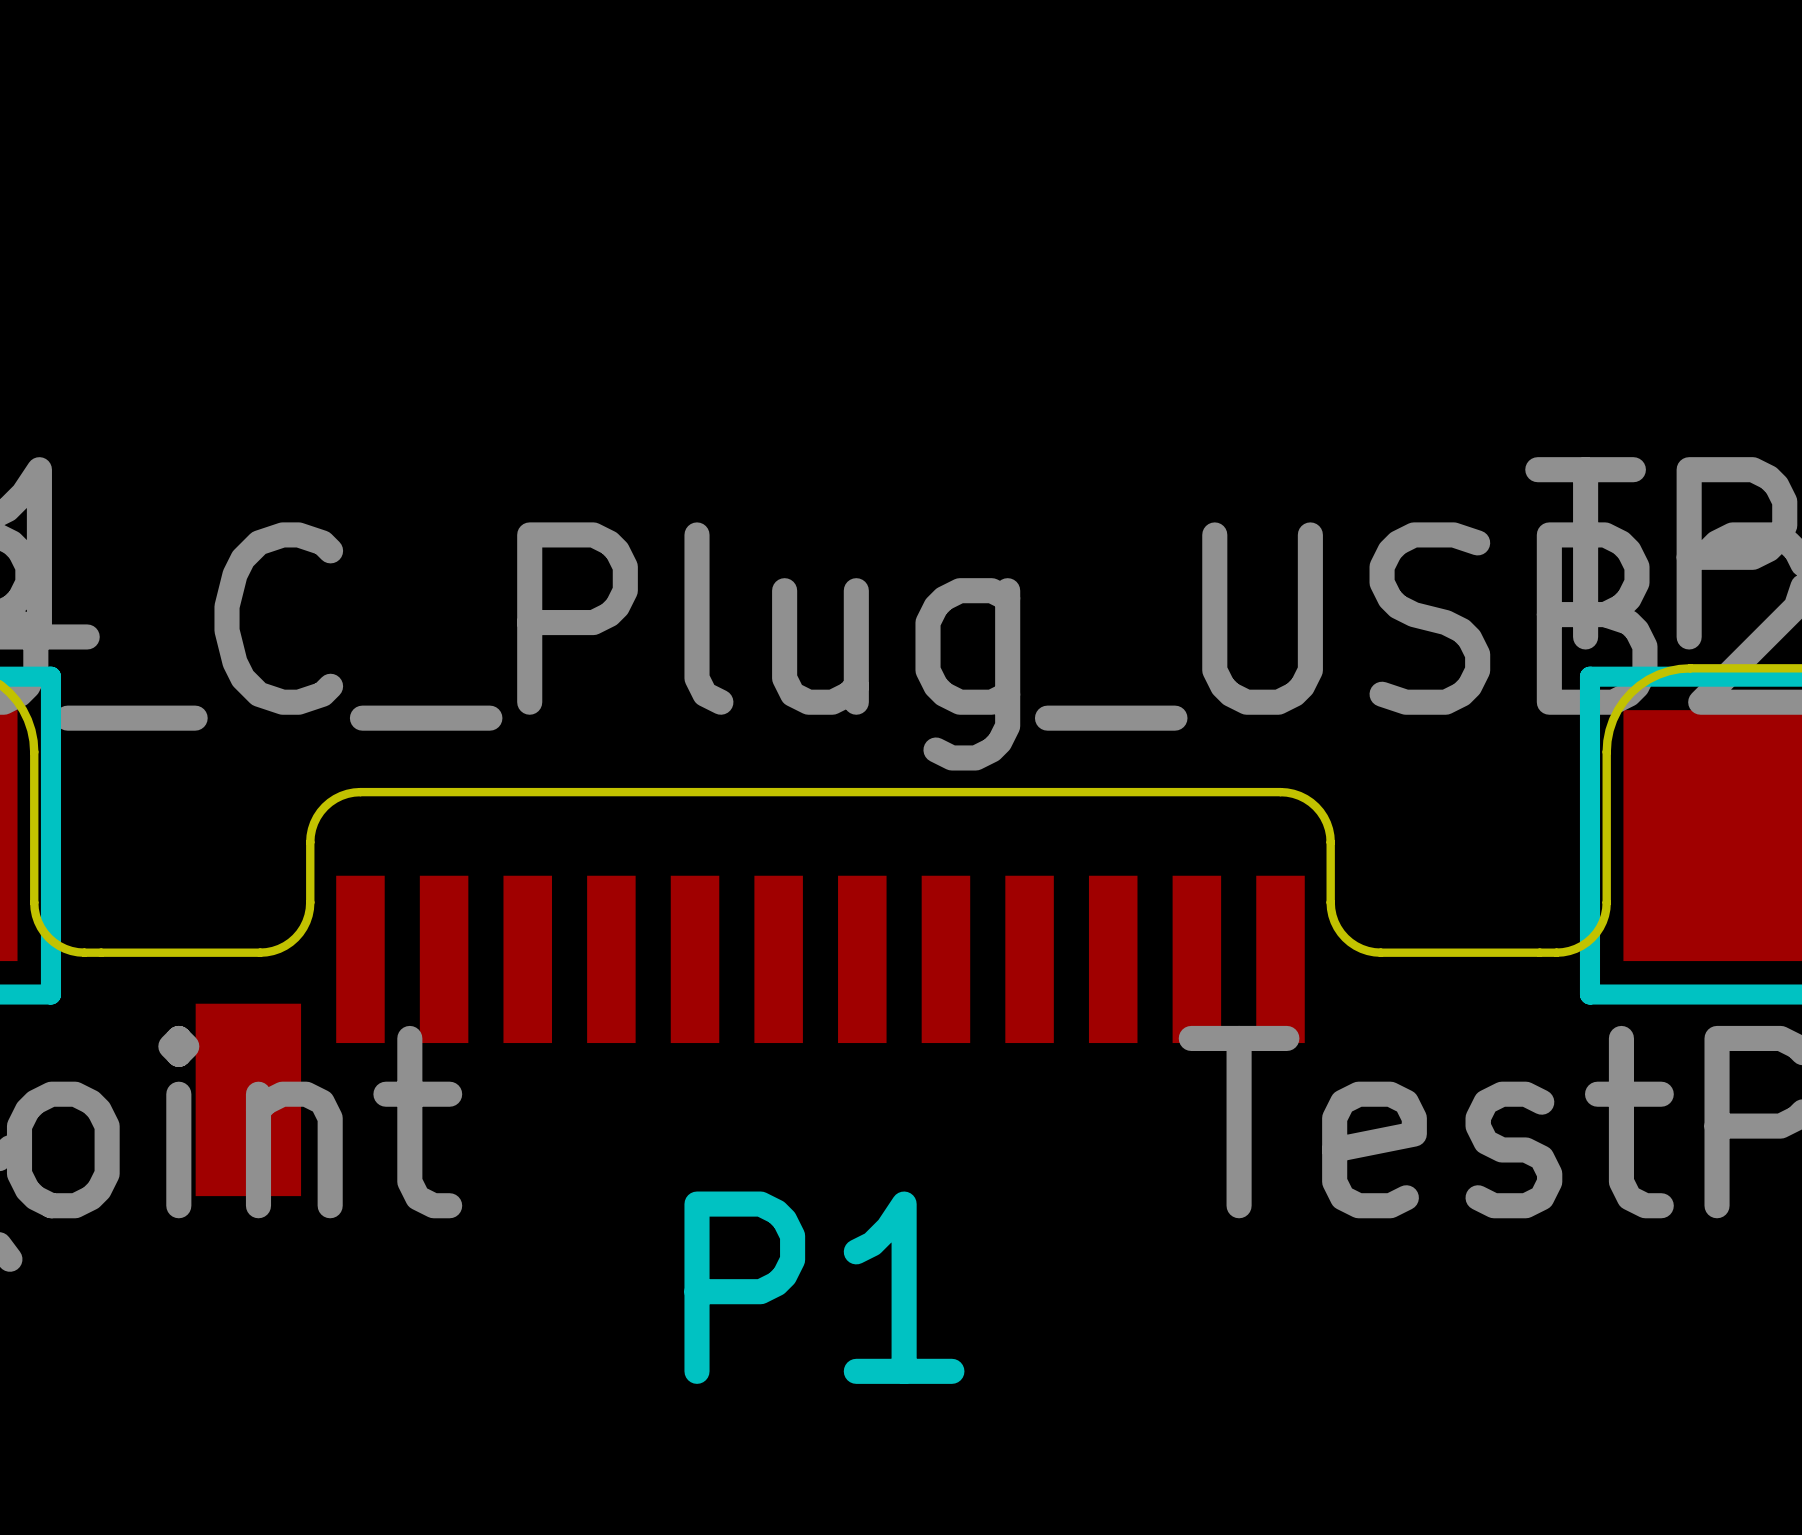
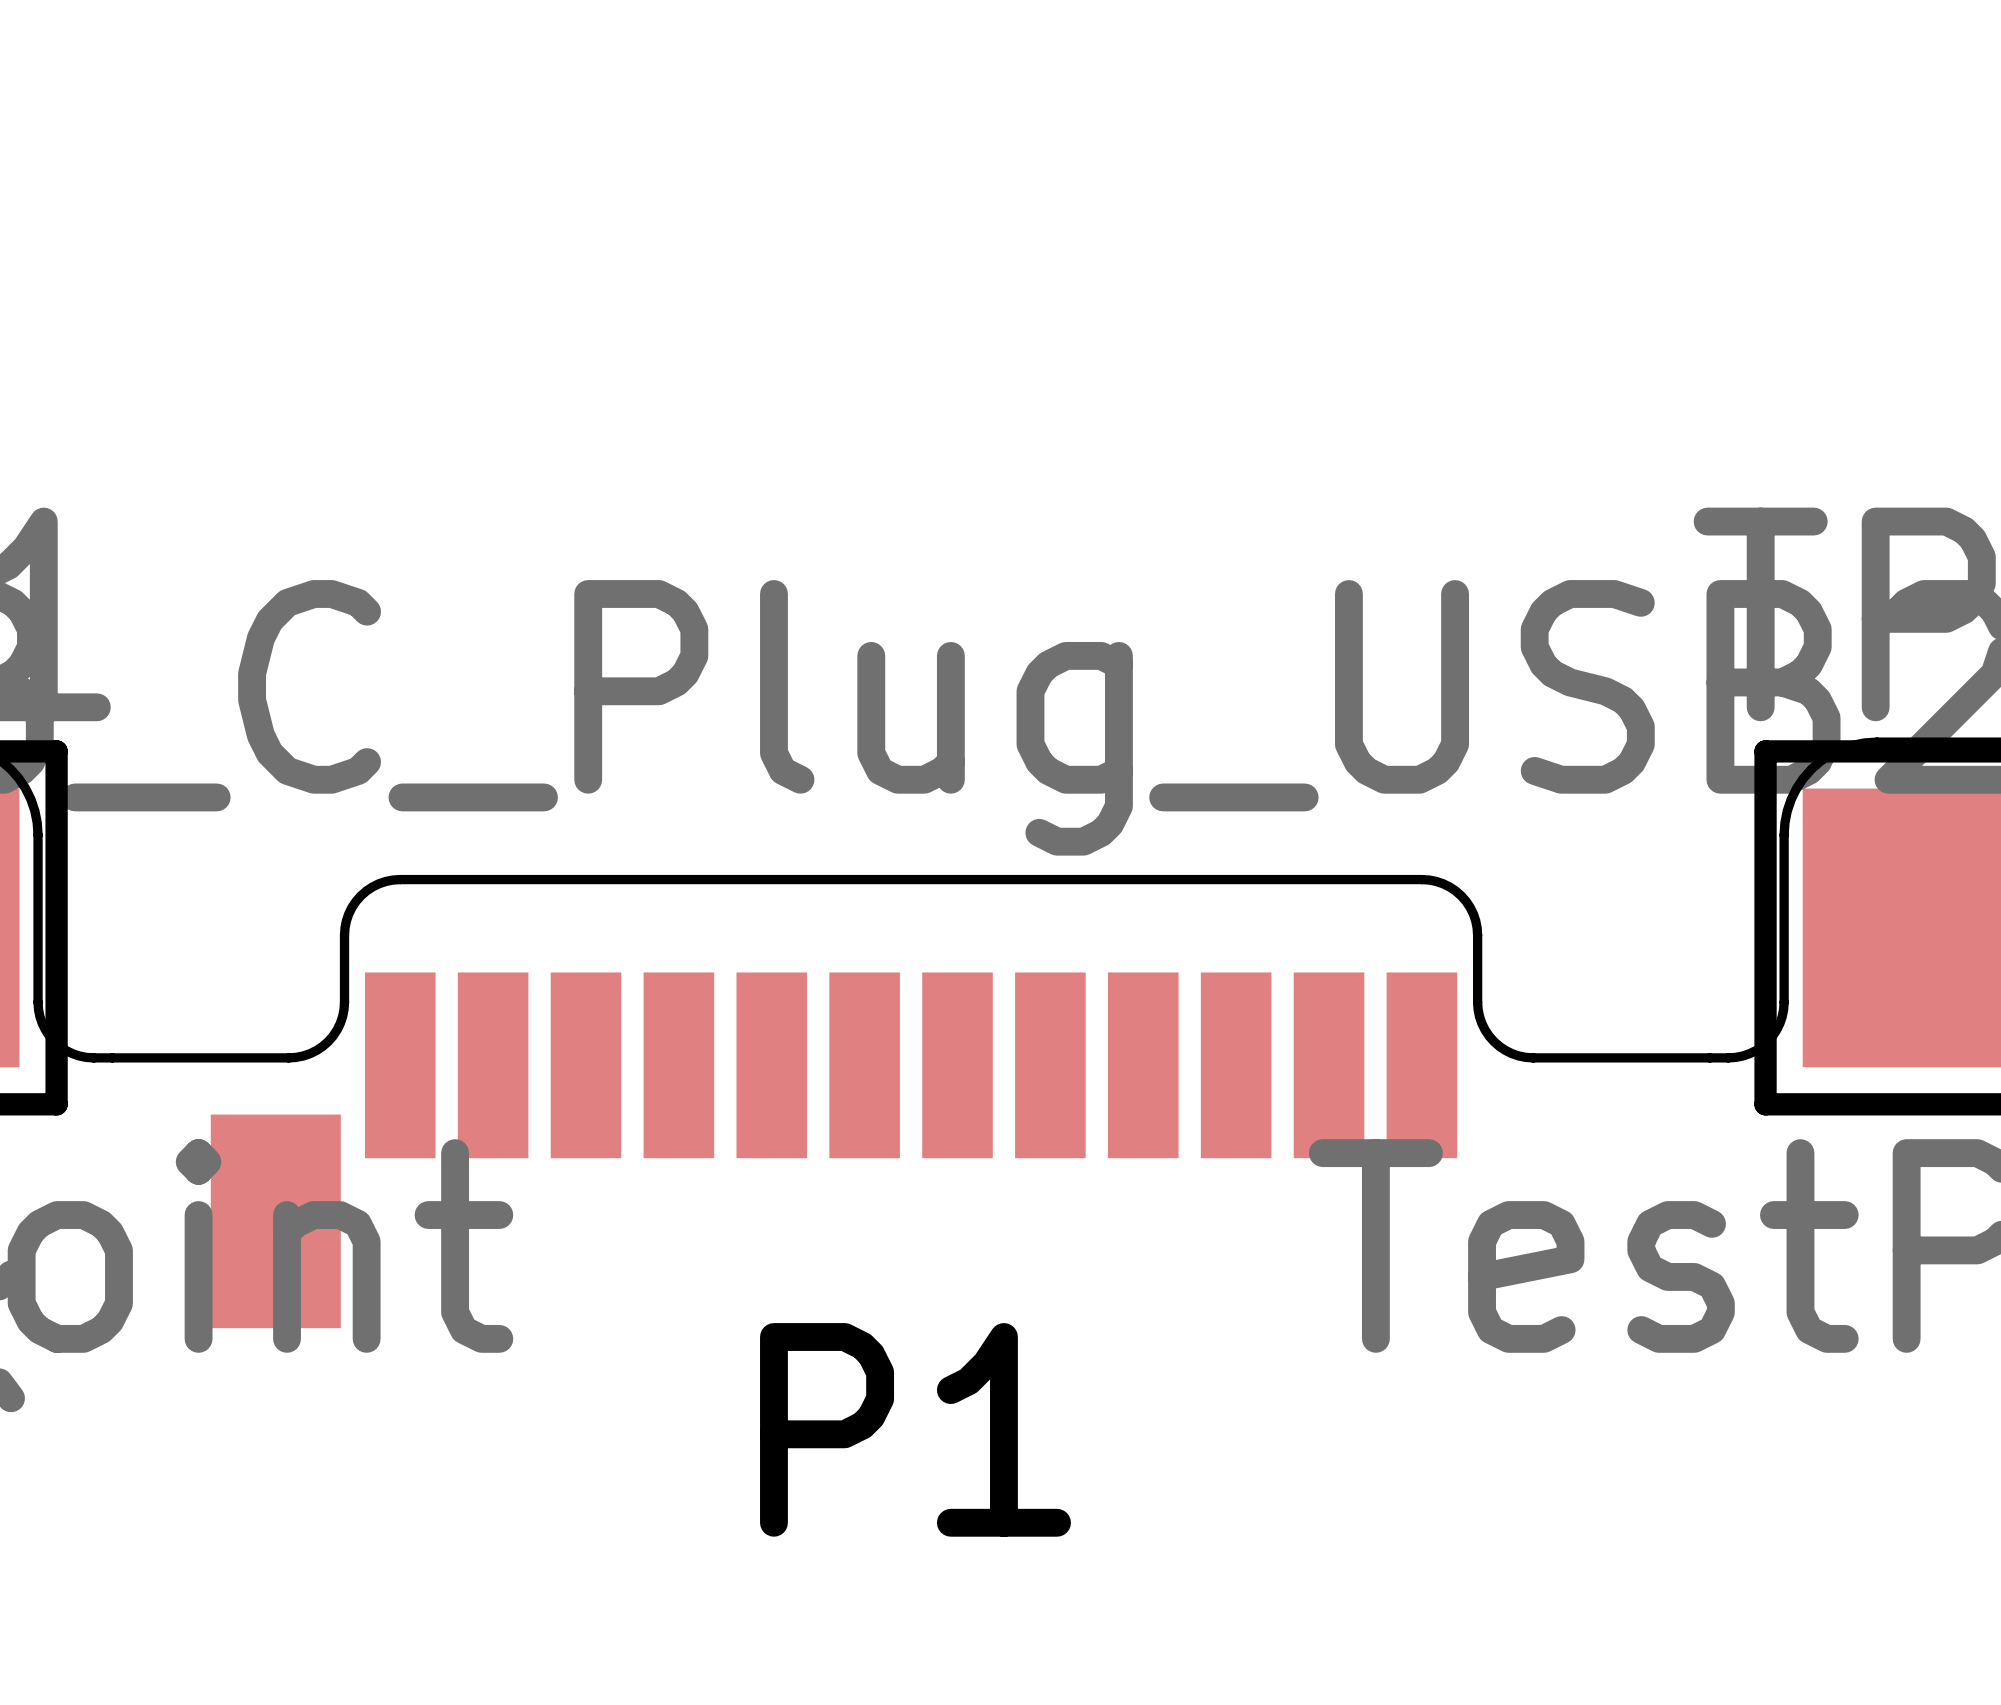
P1 footprint: [96, 787, 1544, 1197] -> [107, 874, 1715, 1329]

